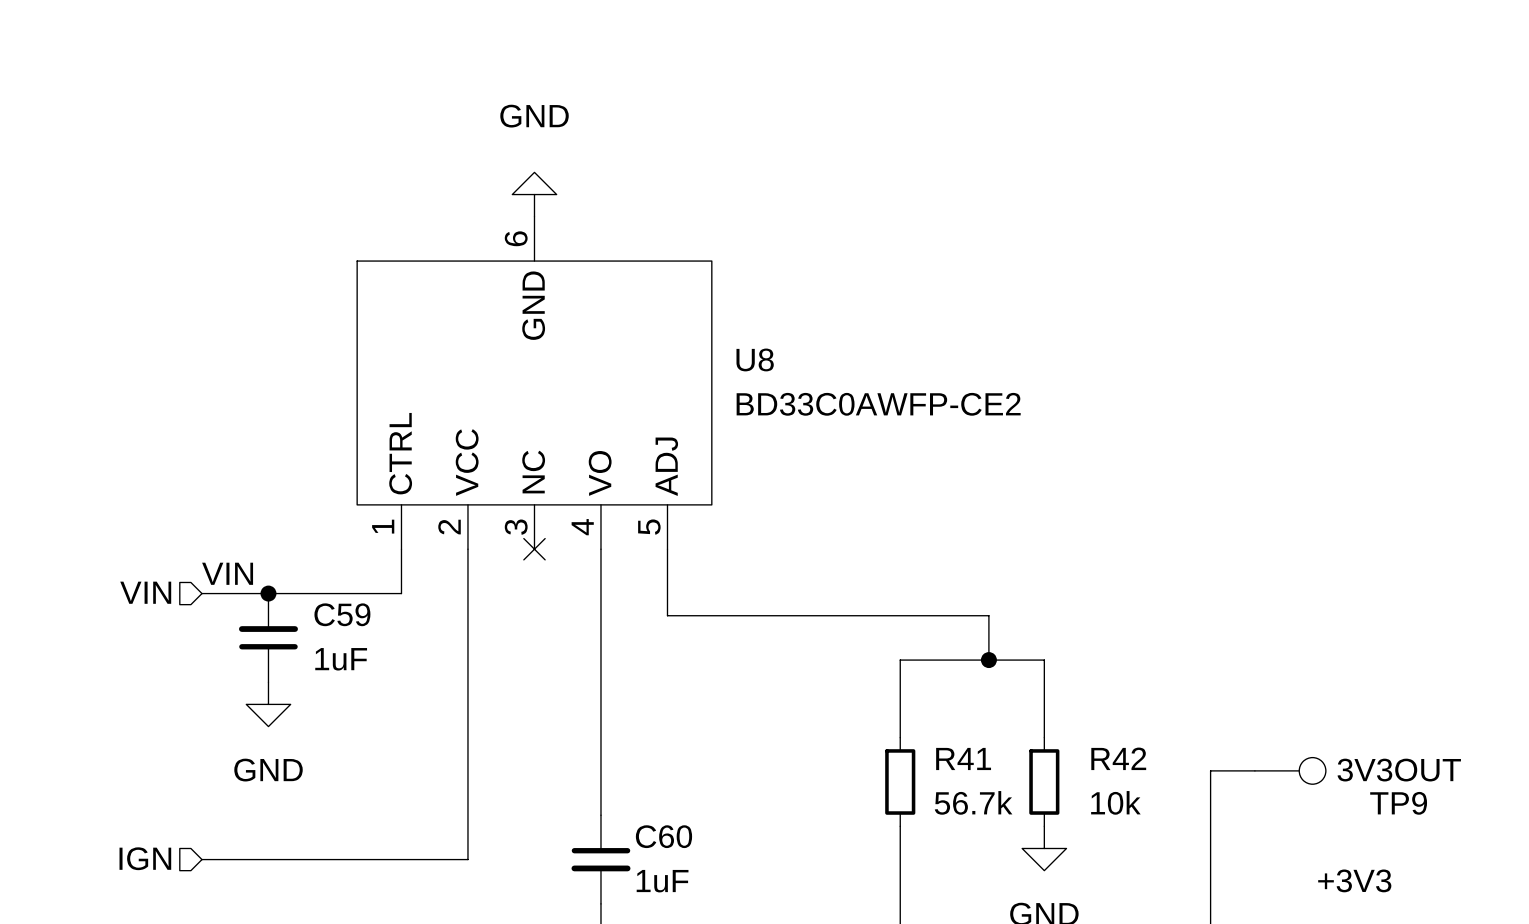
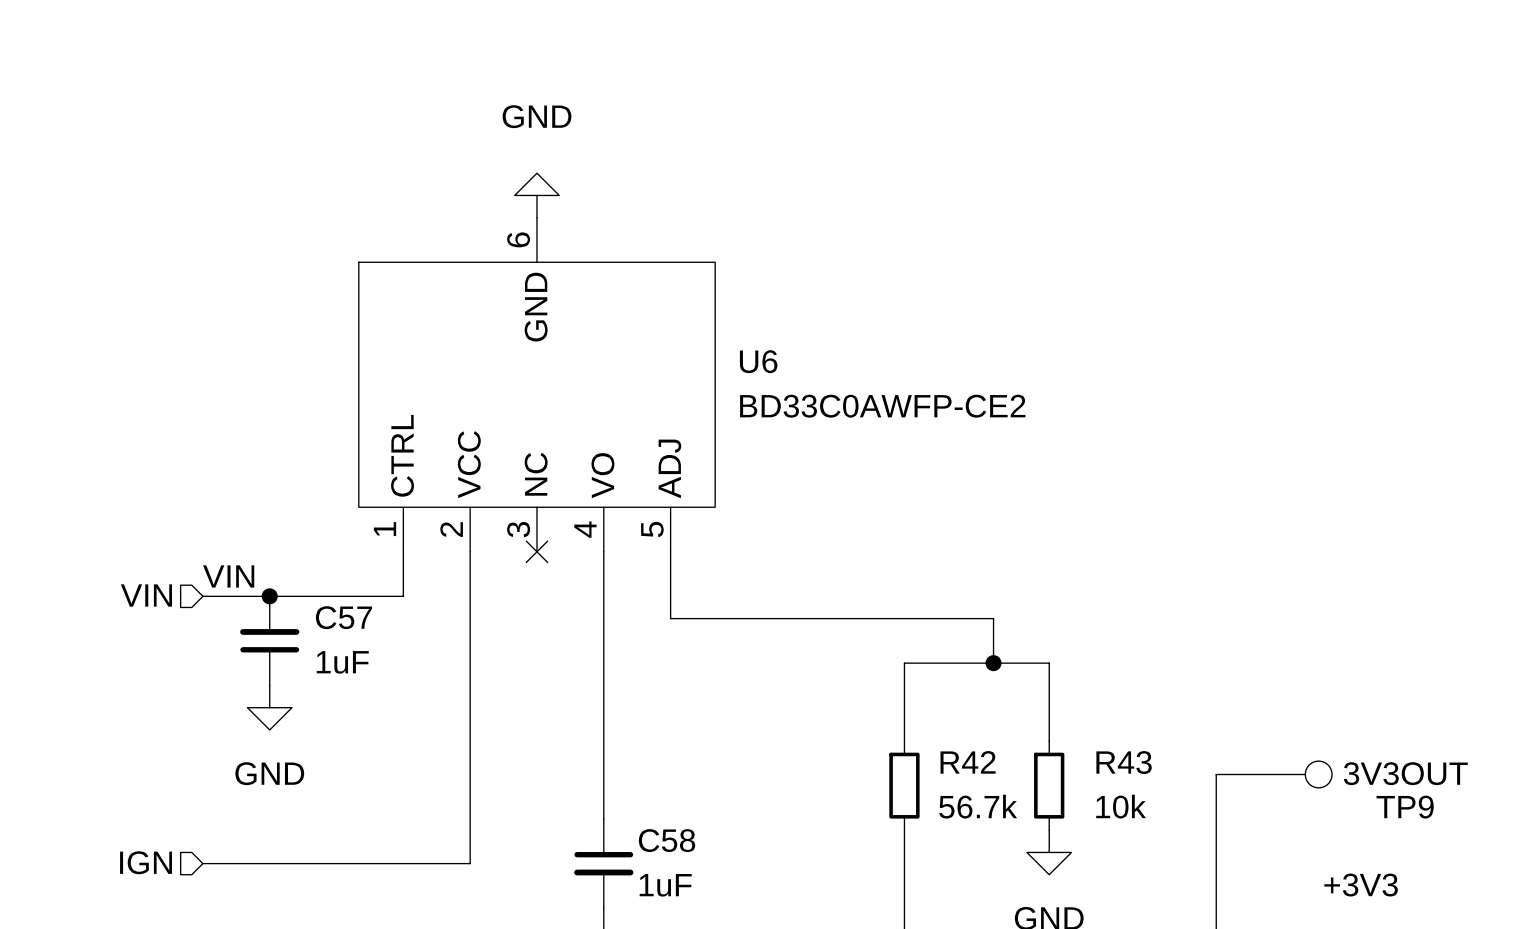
U8 name: U8 (755, 359) -> U6 (758, 361)
C59 name: C59 (342, 614) -> C57 (343, 617)
R41 name: R41 (963, 758) -> R42 (968, 762)
R42 name: R42 (1118, 758) -> R43 (1124, 762)
C60 name: C60 (663, 836) -> C58 (667, 840)

